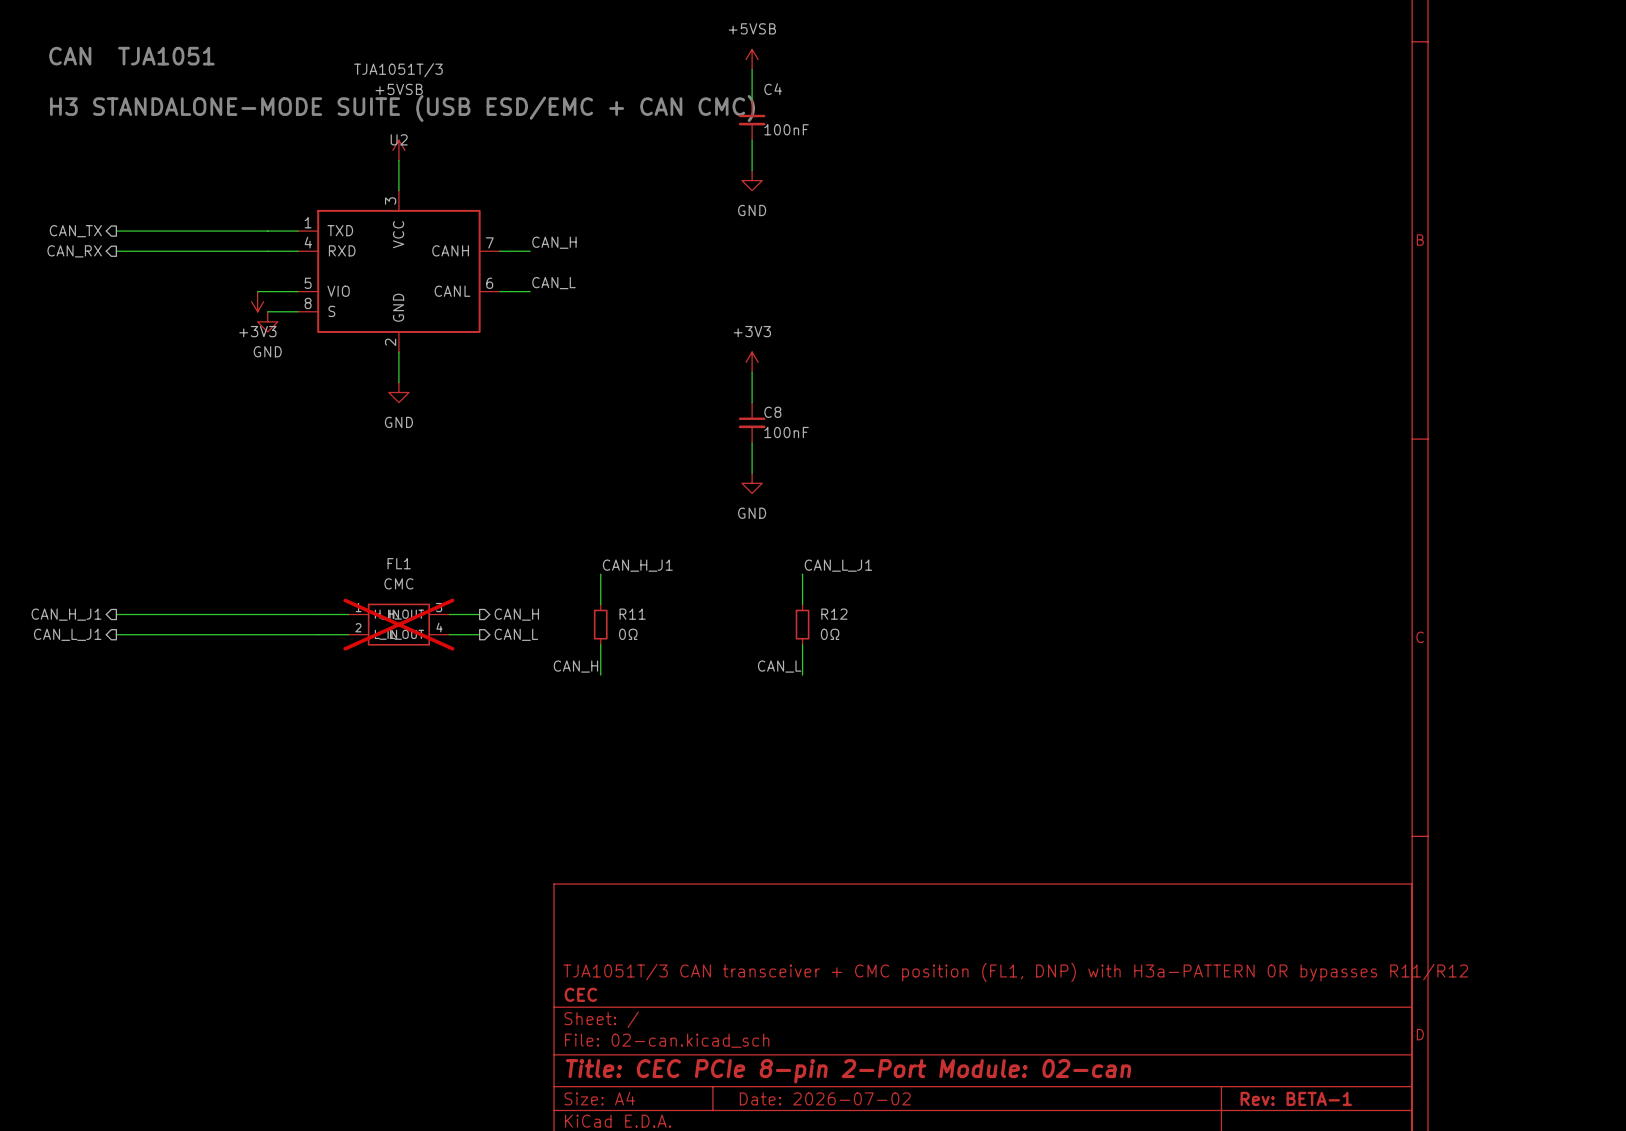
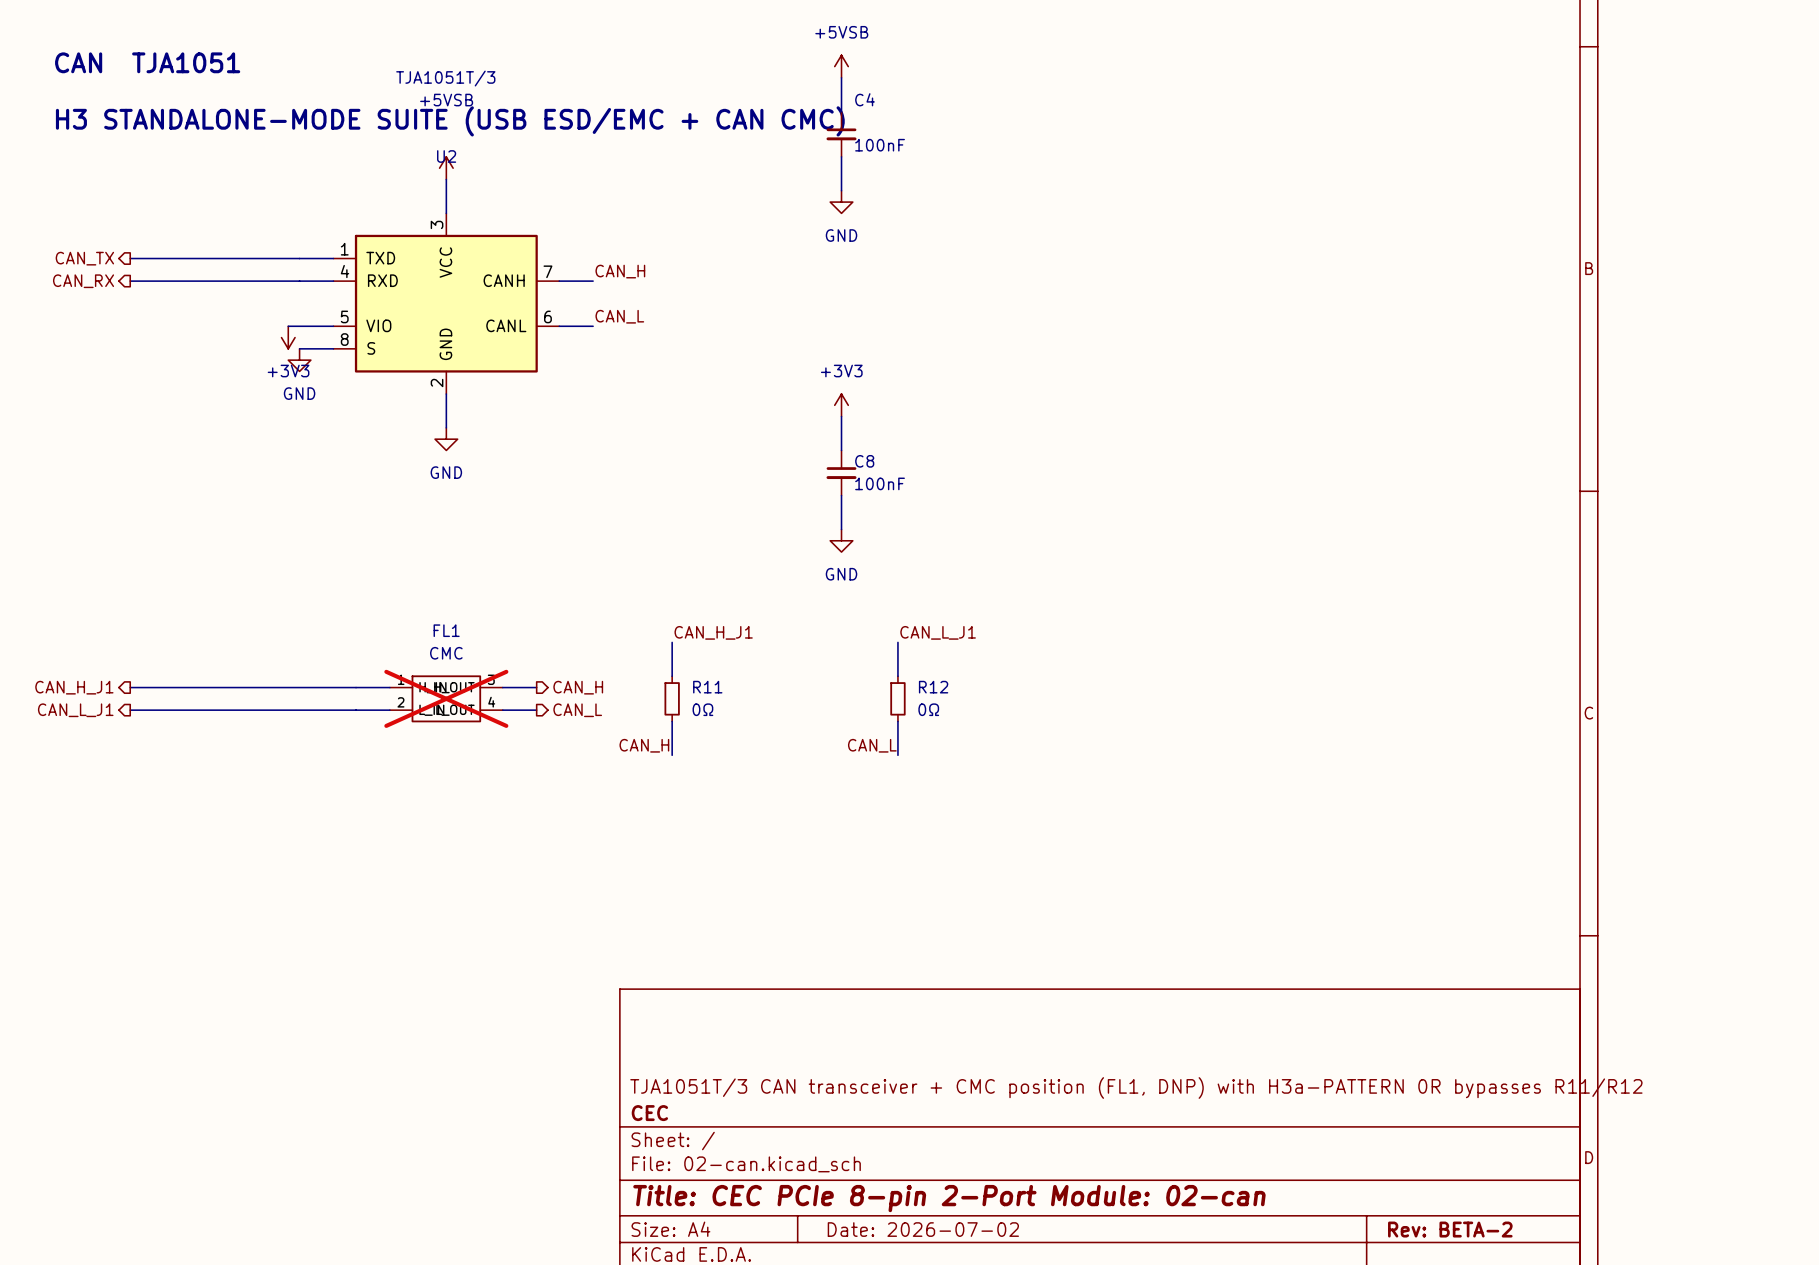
title block: Rev: BETA-1 (1296, 1098) -> Rev: BETA-2 (1450, 1229)

